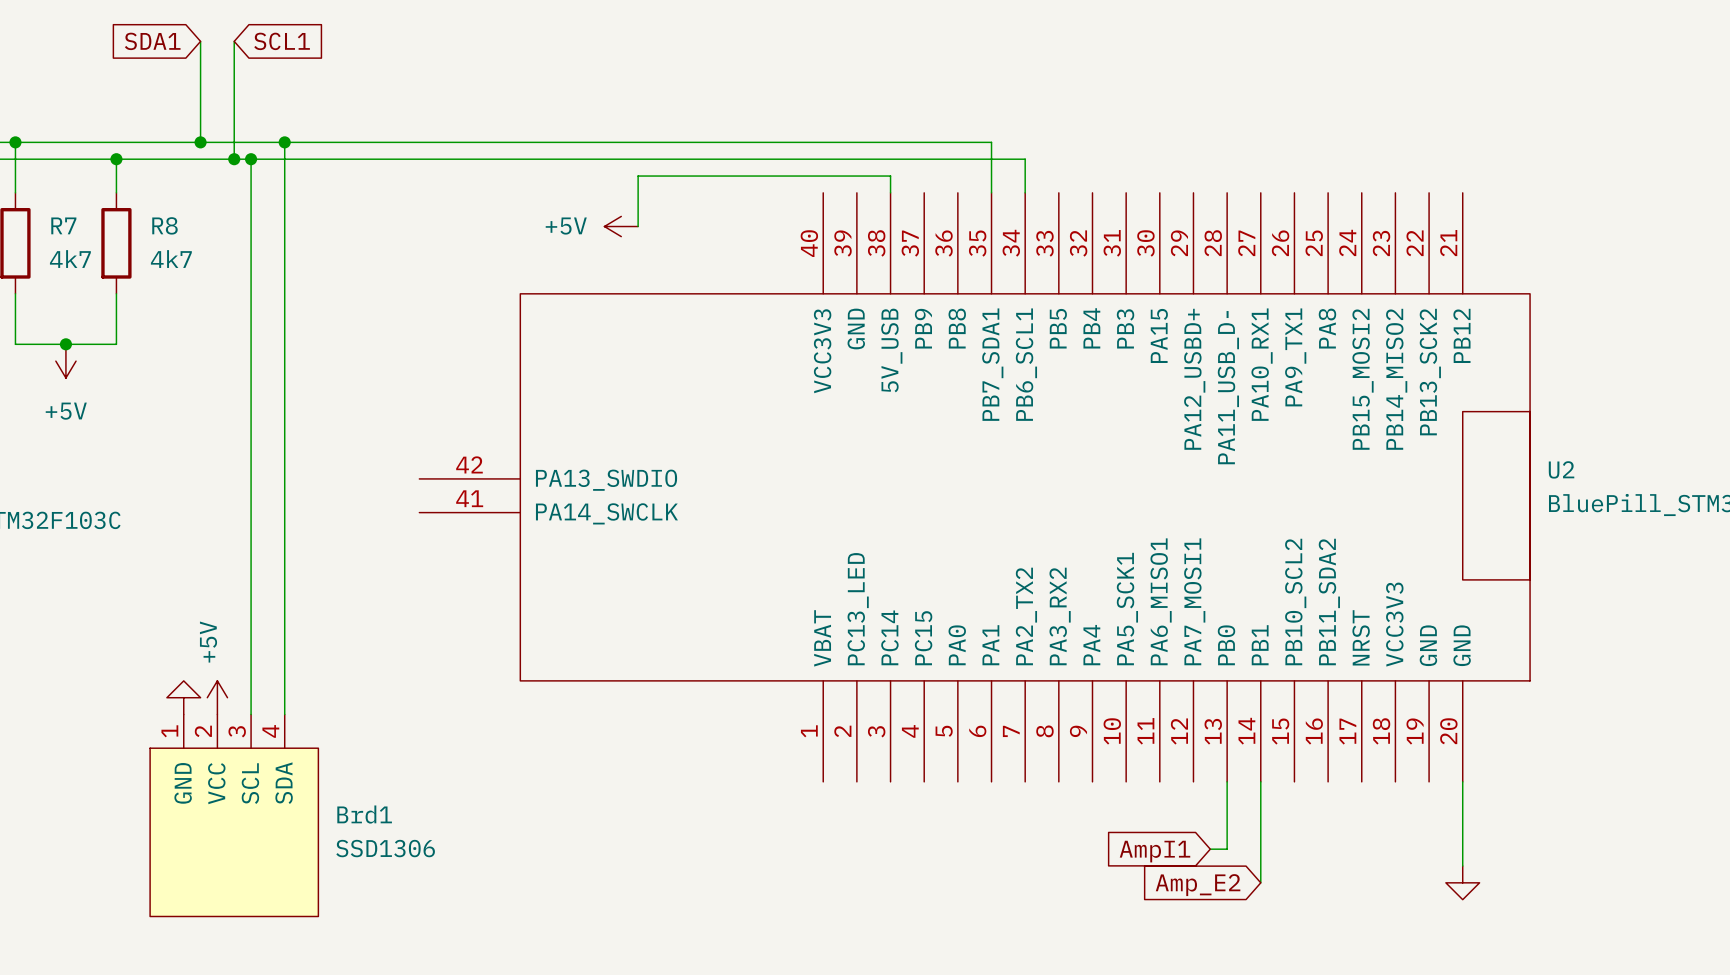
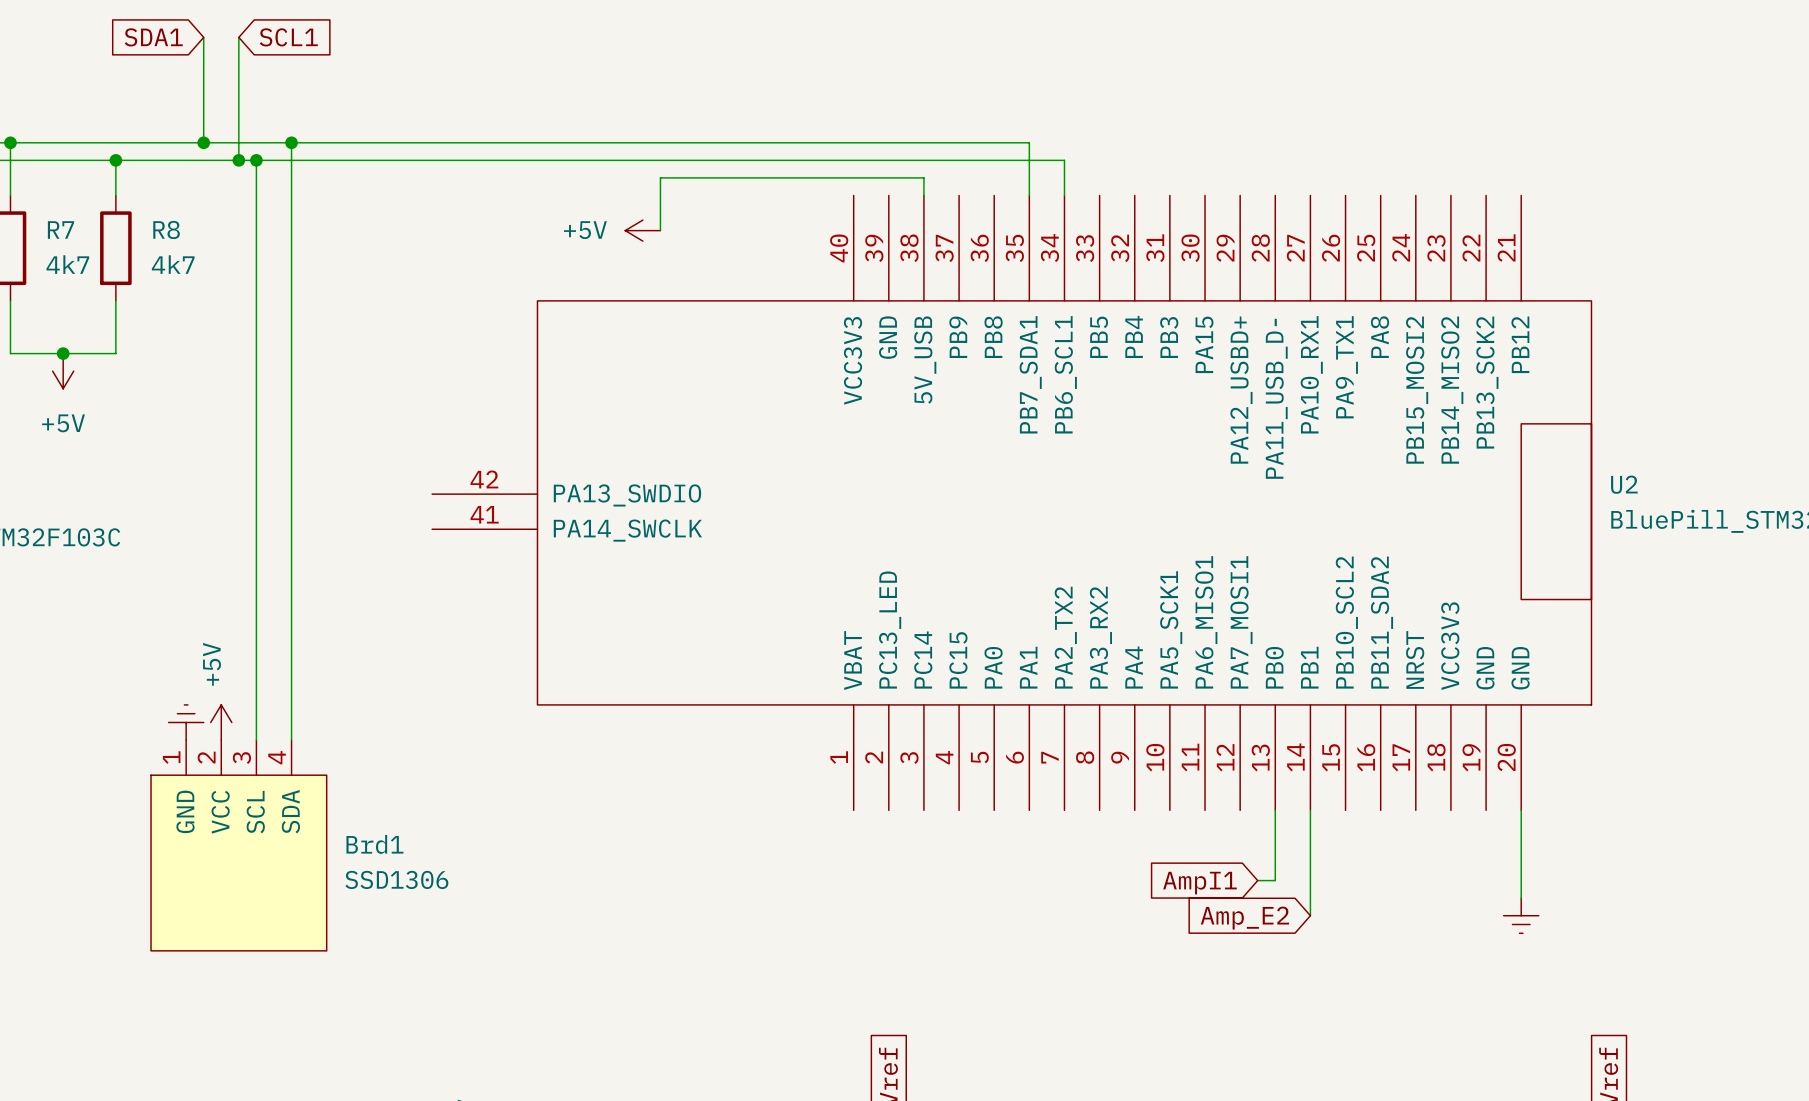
power symbol shape: [166, 680, 201, 715] -> [168, 704, 204, 741]
power symbol shape: [1445, 866, 1480, 900] -> [1503, 898, 1539, 934]

